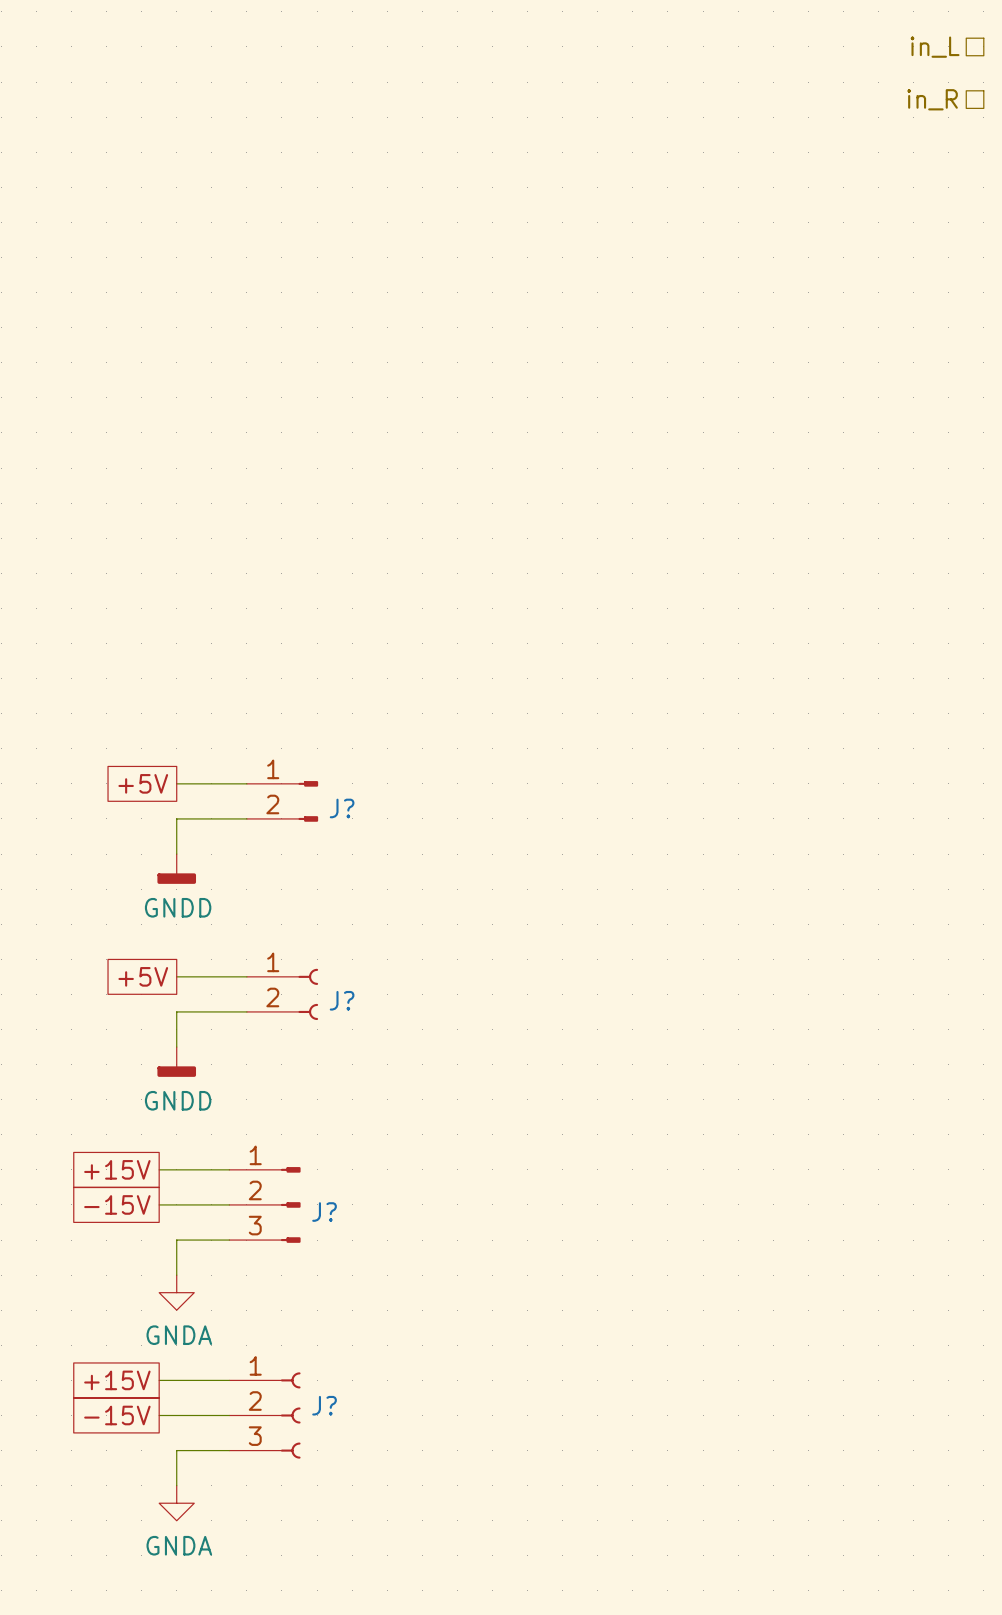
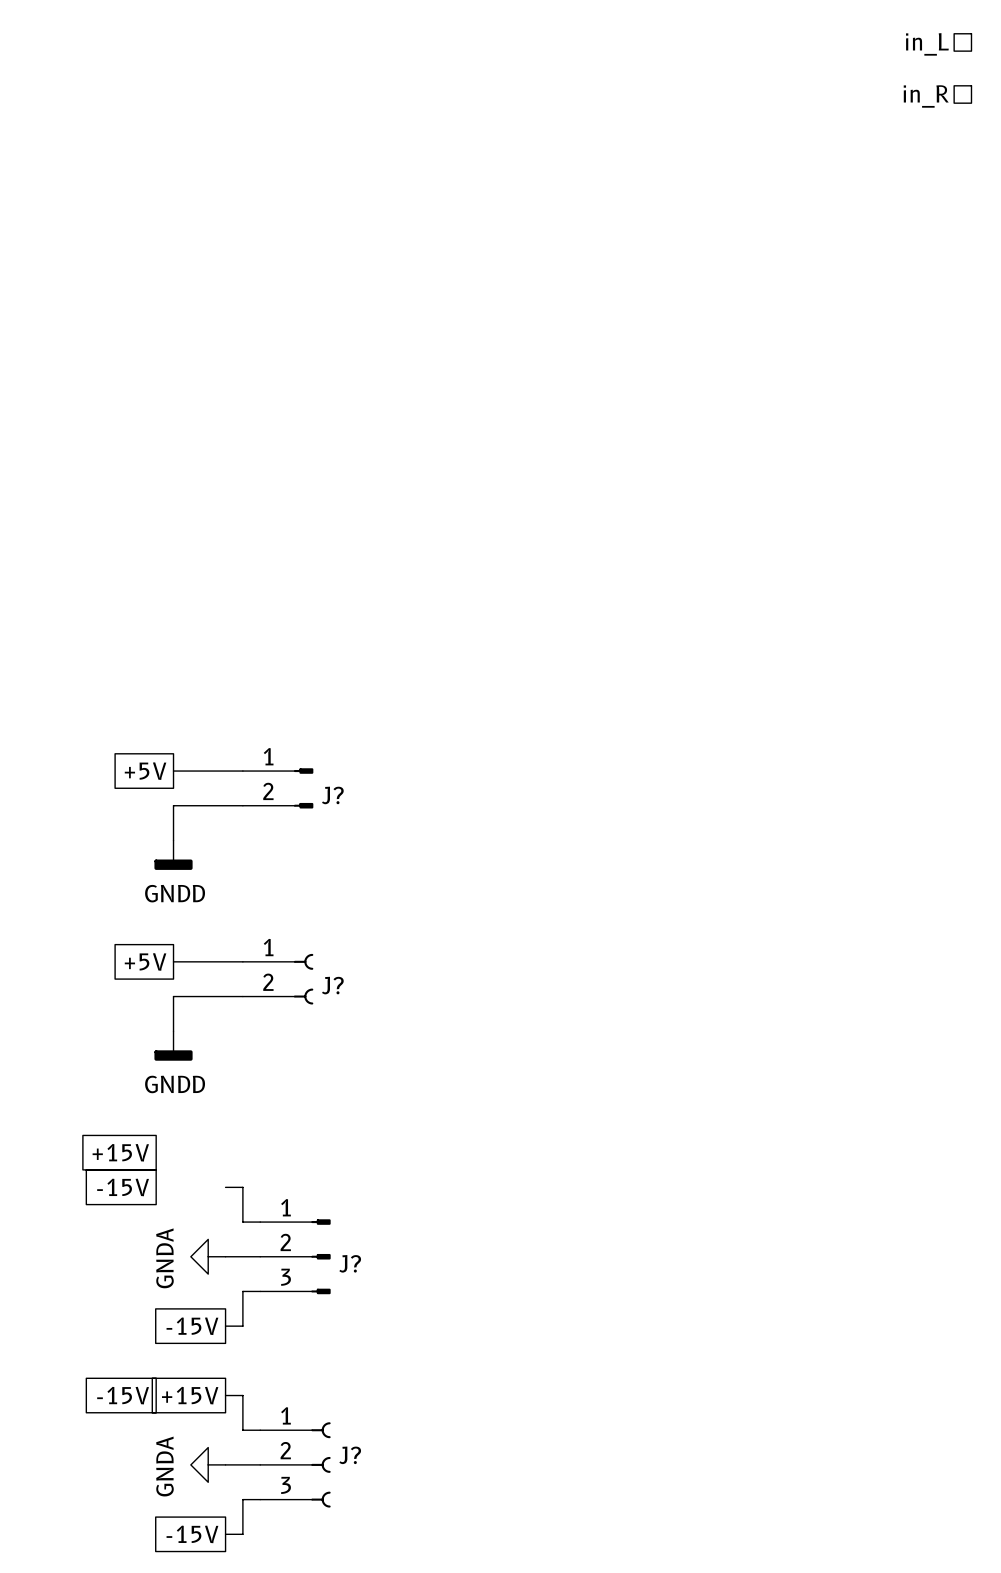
wire: (159, 1169) (229, 1169) -> none
wire: (159, 1204) (229, 1204) -> (260, 1222) (242, 1222) (242, 1187) (225, 1187)
J? position: (264, 1204) -> (295, 1256)
wire: (229, 1240) (176, 1240) (176, 1275) -> none
wire: none -> (225, 1256) (260, 1256)
power symbol rotation: 0° (176, 1292) -> 90° clockwise (208, 1256)
power symbol position: GNDA (176, 1292) -> GNDA (208, 1256)
wire: none -> (260, 1291) (242, 1291) (242, 1326) (225, 1326)
global label: none -> -15V (192, 1326)
global label position: +15V (117, 1380) -> +15V (190, 1395)
wire: (159, 1380) (229, 1380) -> none
wire: (159, 1415) (229, 1415) -> (260, 1430) (242, 1430) (242, 1395) (225, 1395)
J? position: (264, 1415) -> (295, 1464)
wire: (229, 1450) (176, 1450) (176, 1485) -> none
wire: none -> (225, 1464) (260, 1464)
power symbol rotation: 0° (176, 1503) -> 90° clockwise (208, 1464)
power symbol position: GNDA (176, 1503) -> GNDA (208, 1464)
wire: none -> (260, 1499) (242, 1499) (242, 1534) (225, 1534)
global label: none -> -15V (192, 1534)

